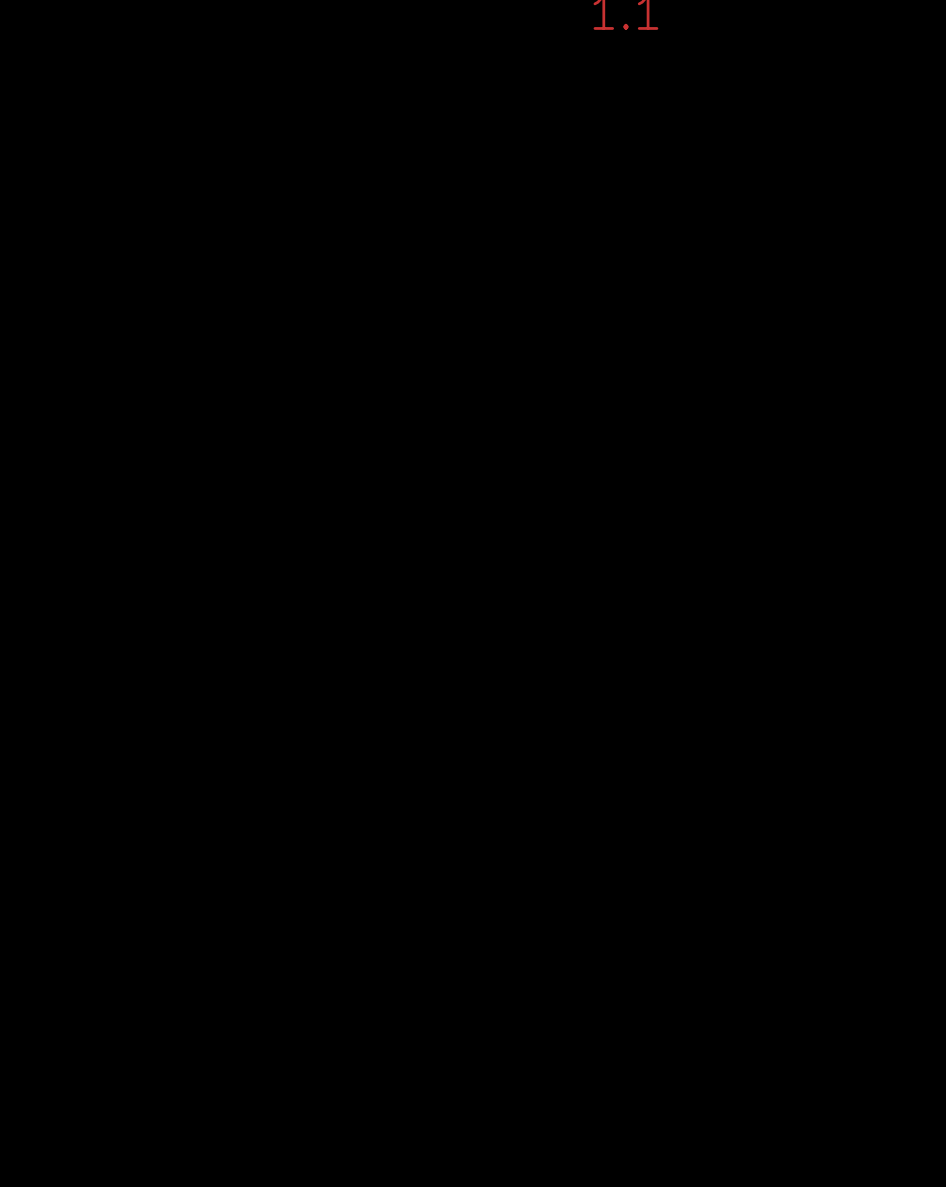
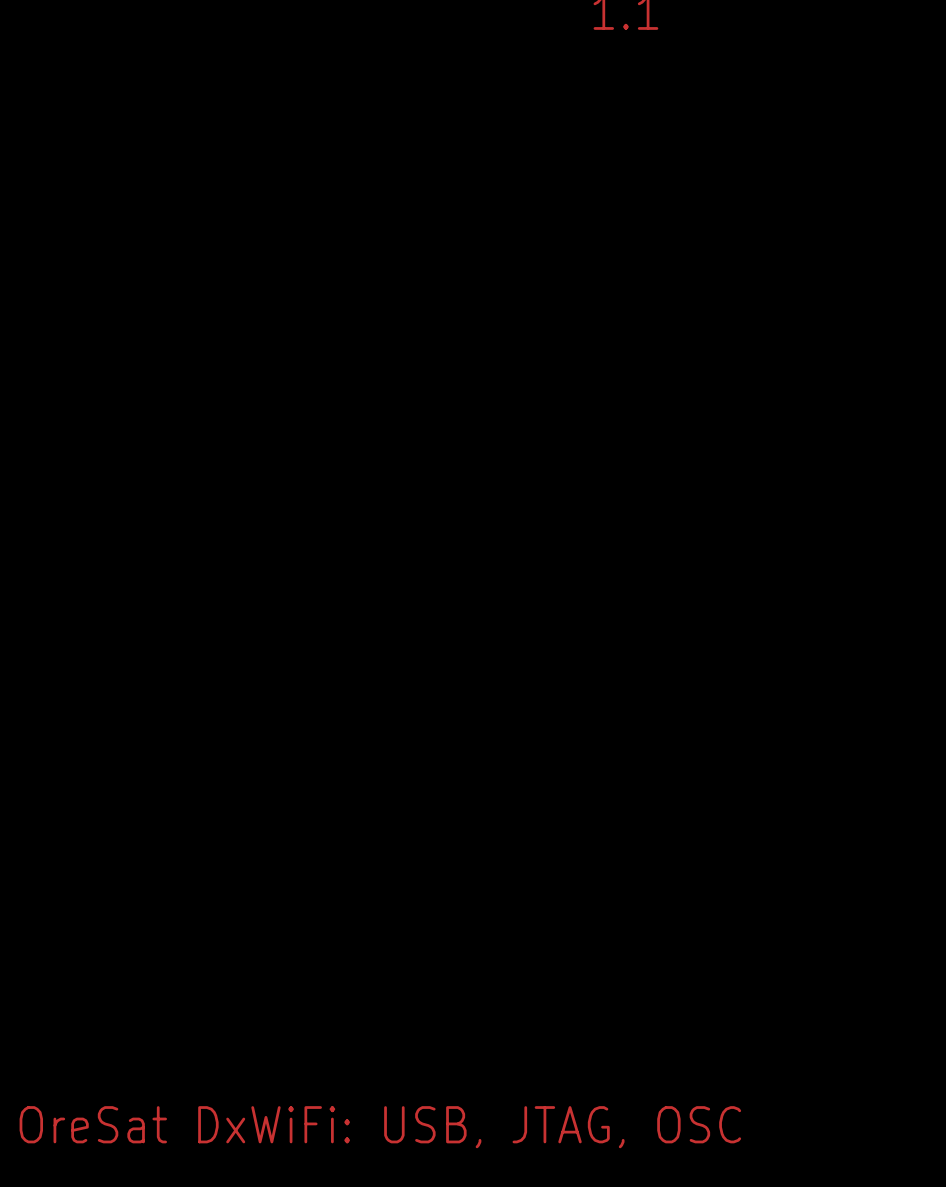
text: none -> OreSat DxWiFi: USB, JTAG, OSC (380, 1127)

